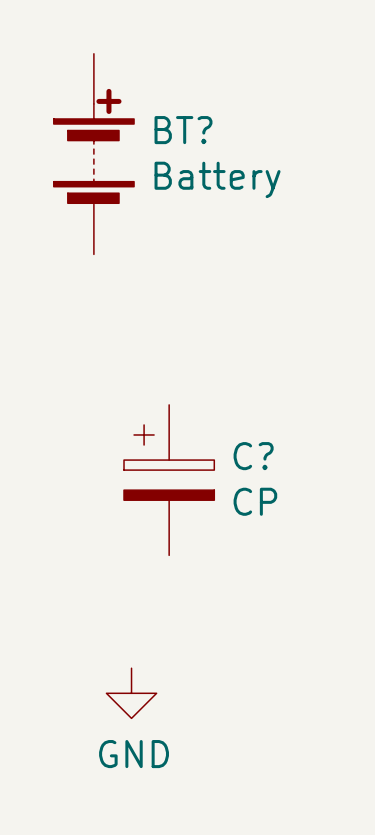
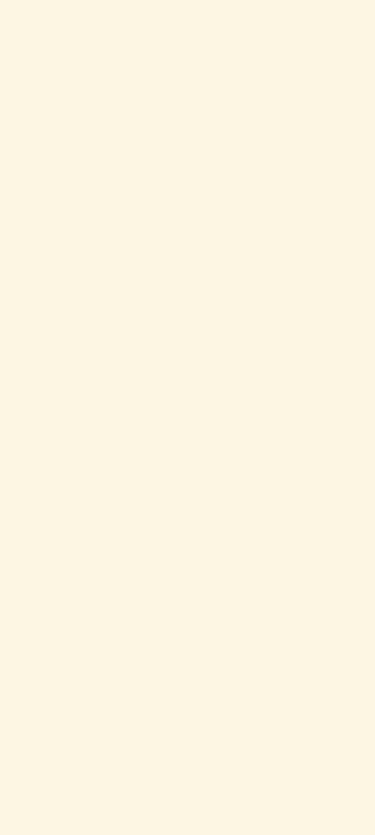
BT?: Battery (93, 154) -> none
C?: CP (169, 480) -> none
power symbol: GND (131, 693) -> none

